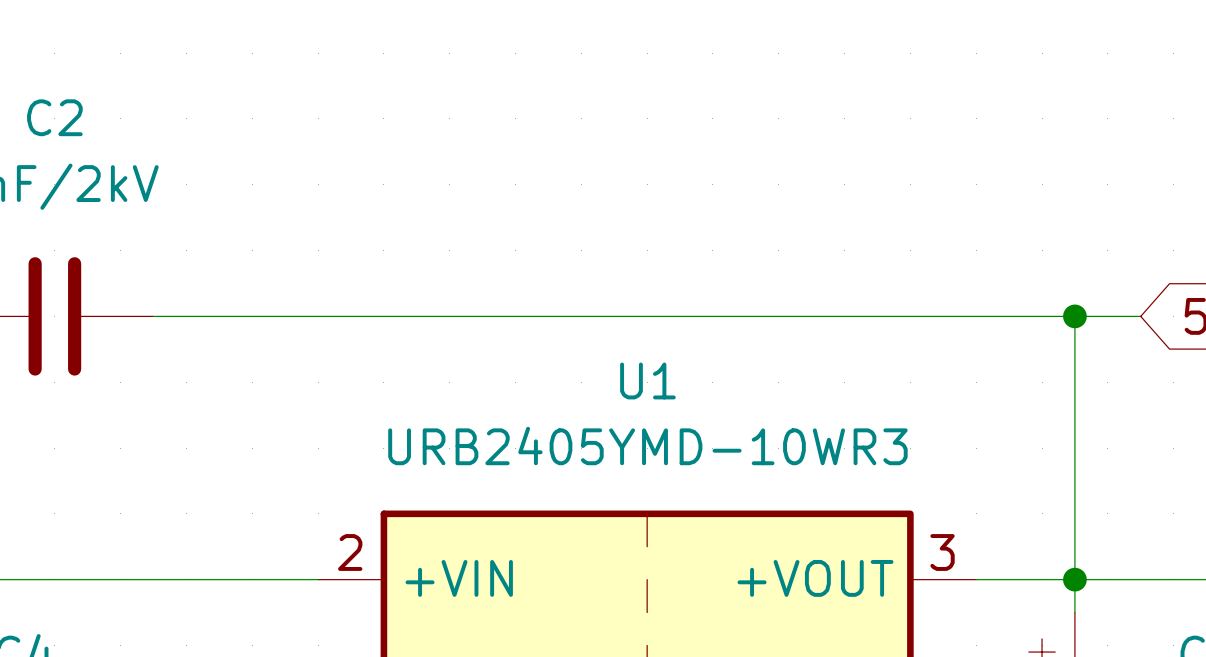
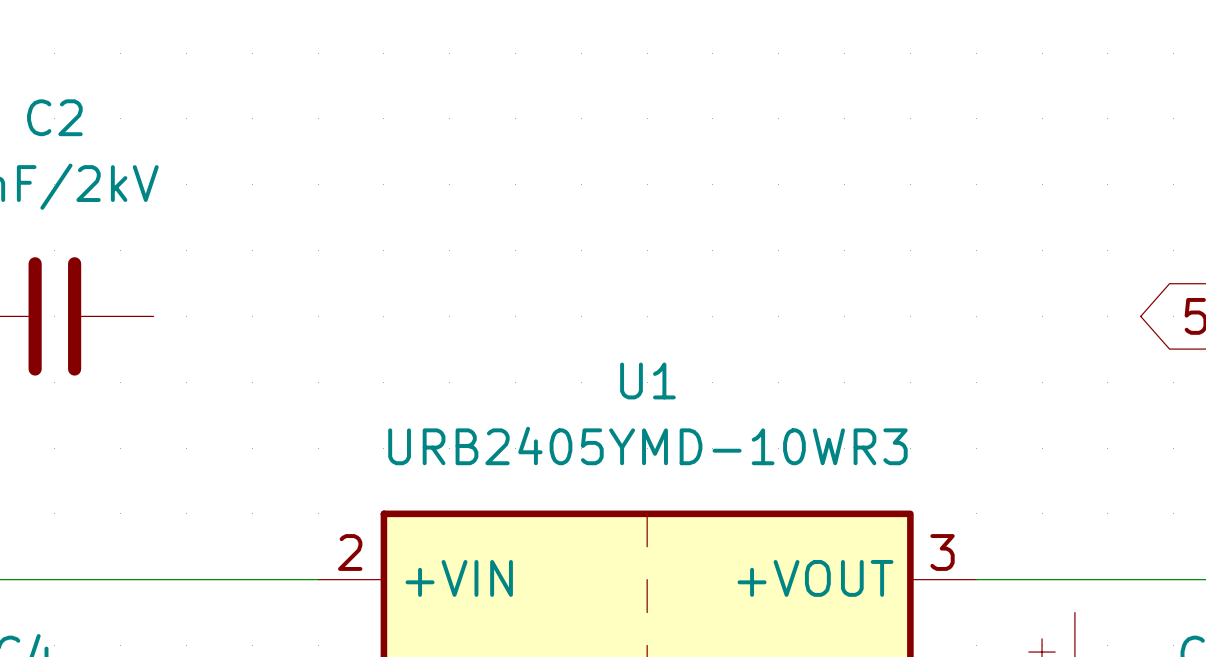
wire: (153, 316) (1140, 316) -> none
wire: (1074, 316) (1074, 612) -> none
junction: (1074, 316) -> none
junction: (1074, 579) -> none

